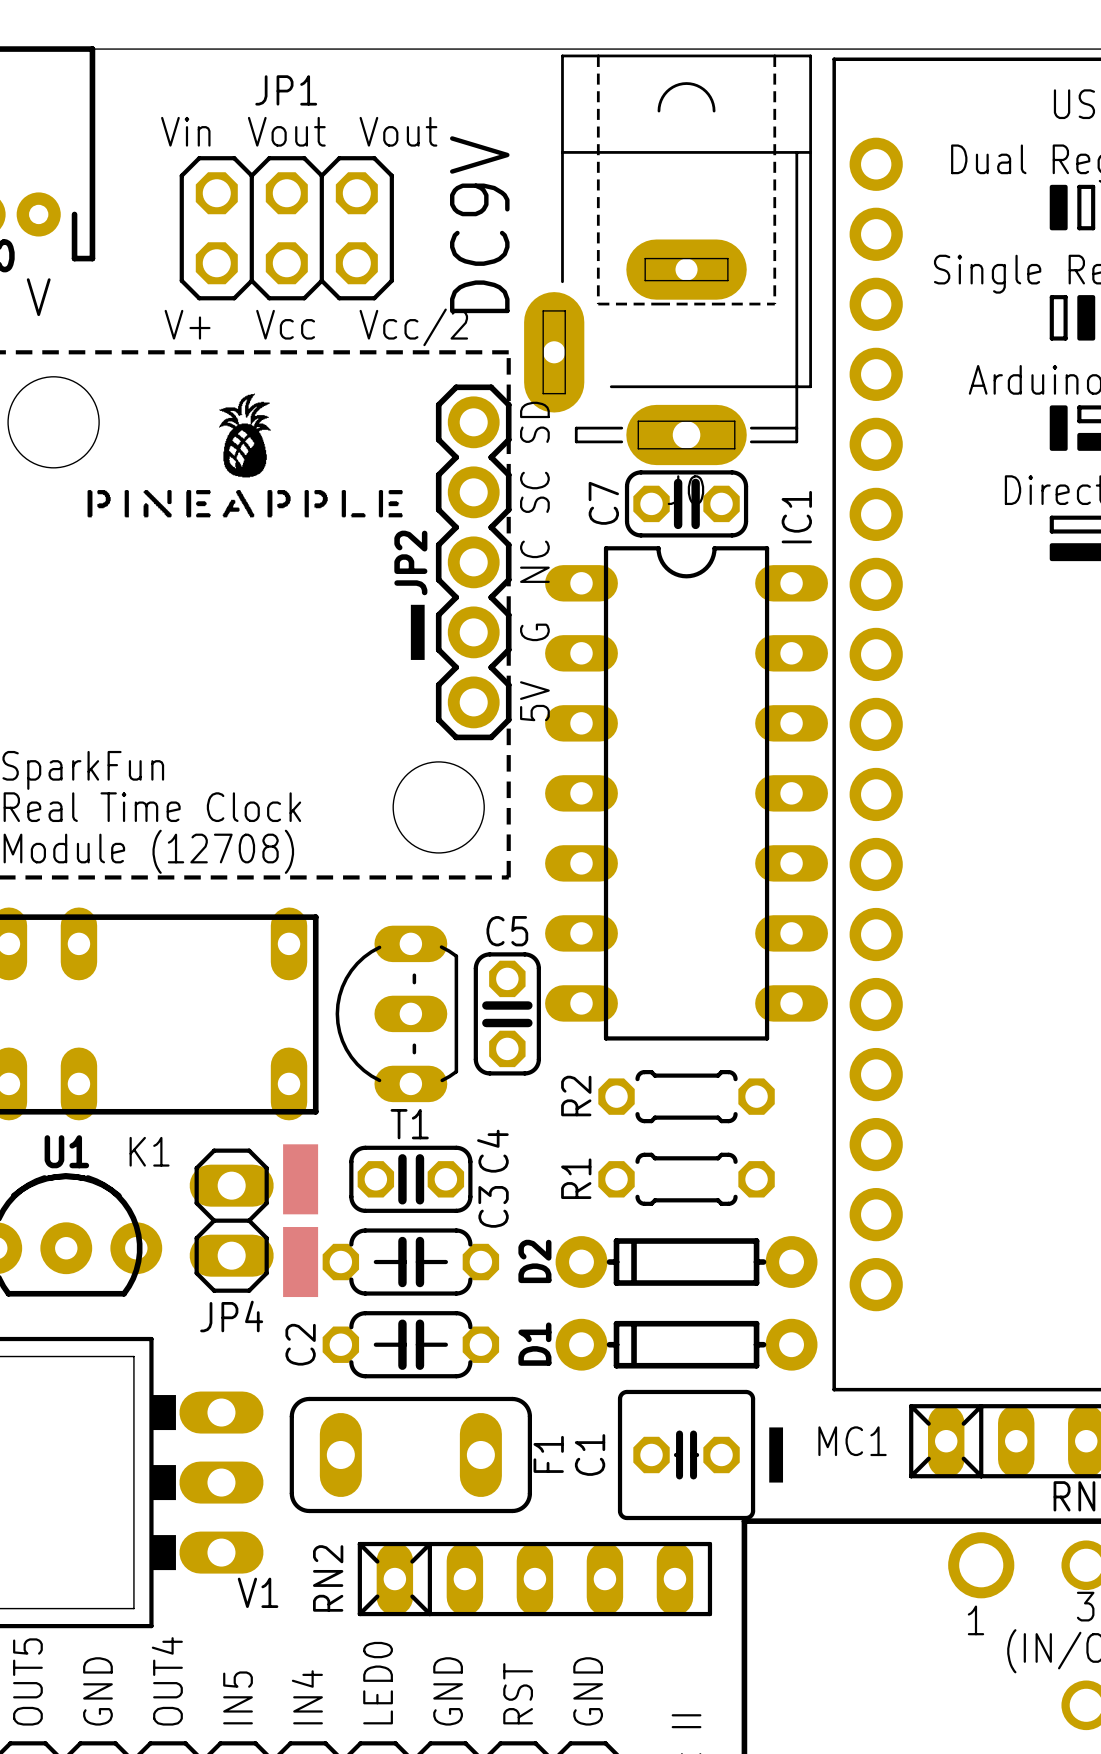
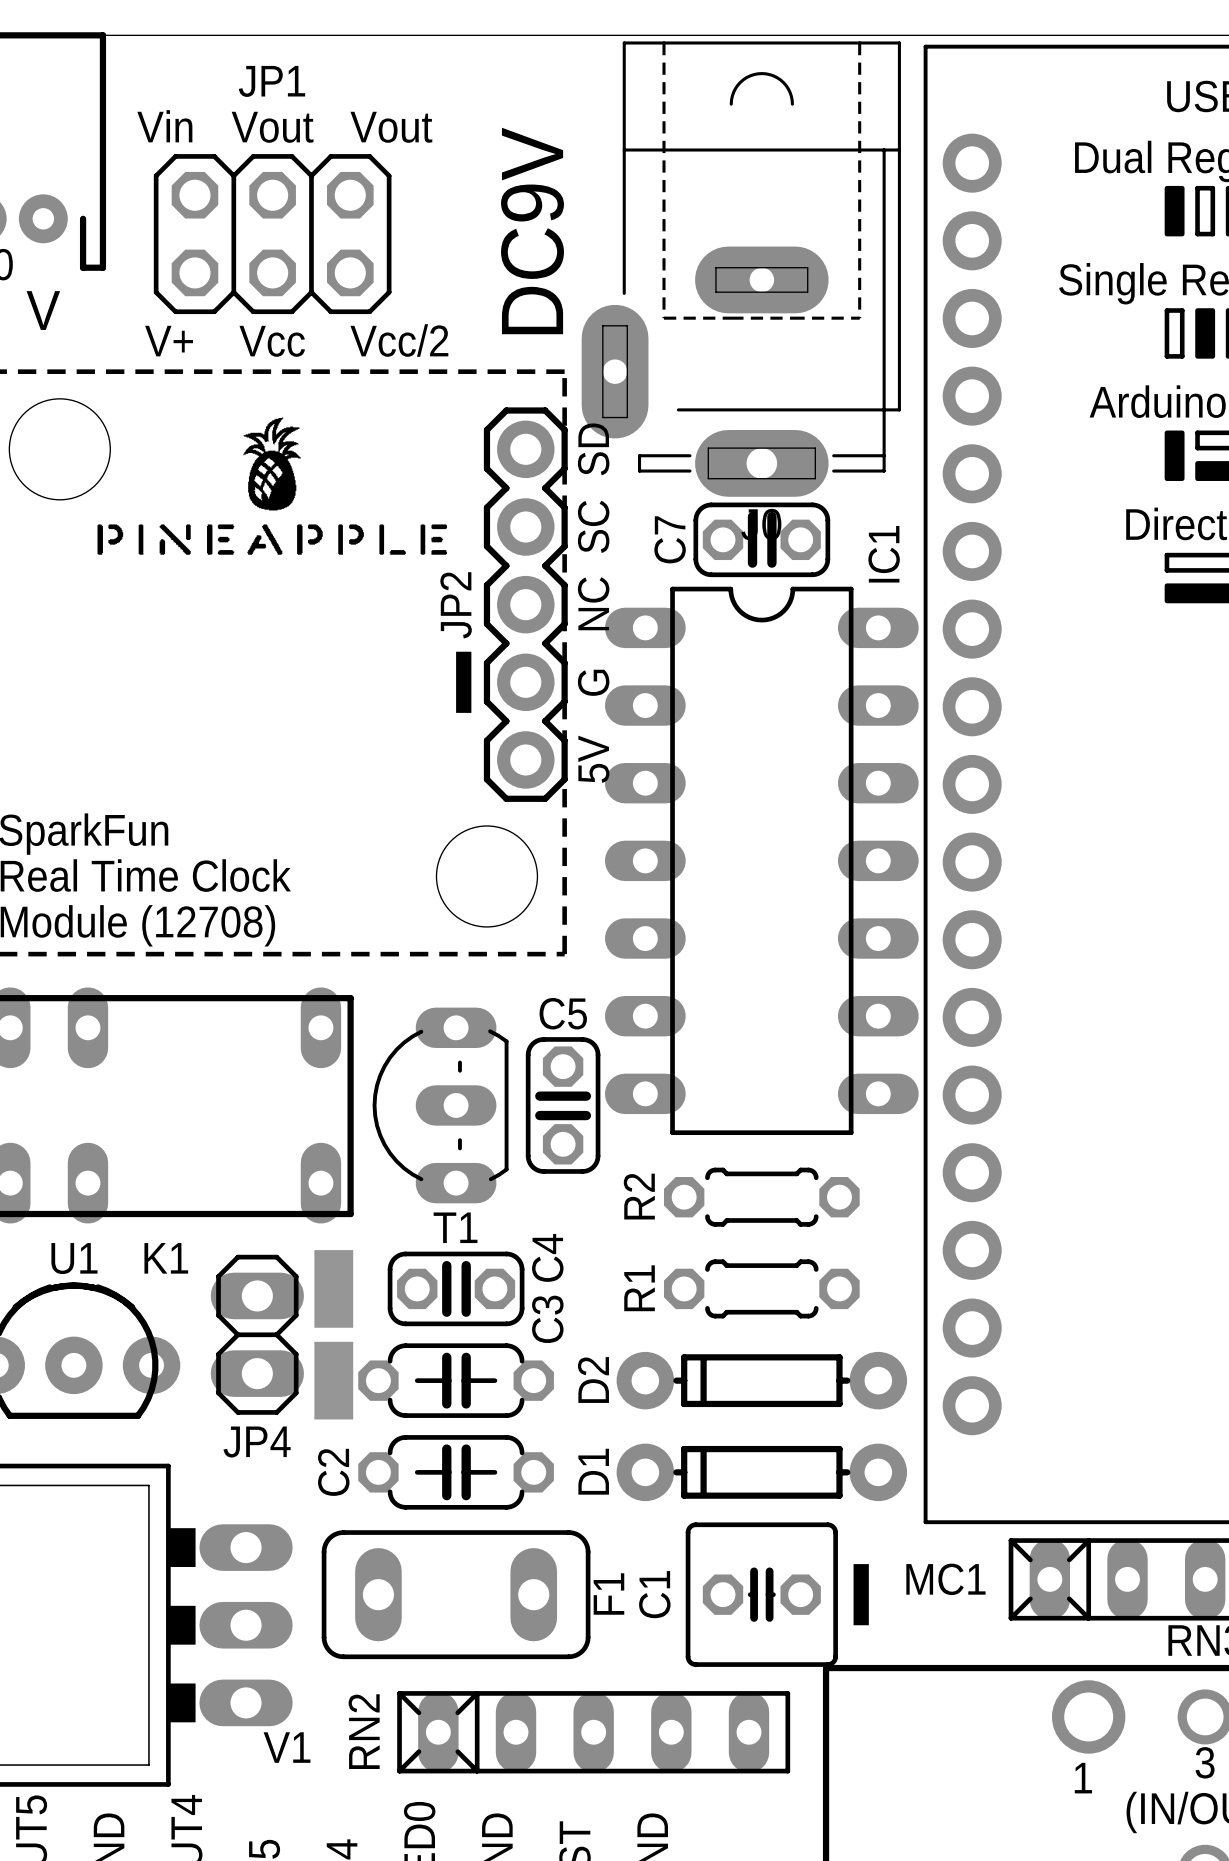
text position: Vin (185, 131) -> Vin (164, 126)
text: none -> Vout (272, 127)
text: Vout (286, 131) -> none
text: none -> Vout (391, 127)
text: Vout (398, 131) -> none
JP1 position: (286, 228) -> (272, 234)
text position: V+ (187, 324) -> V+ (169, 341)
text position: Vcc (285, 324) -> Vcc (272, 341)
text position: Vcc/2 (413, 327) -> Vcc/2 (399, 340)

